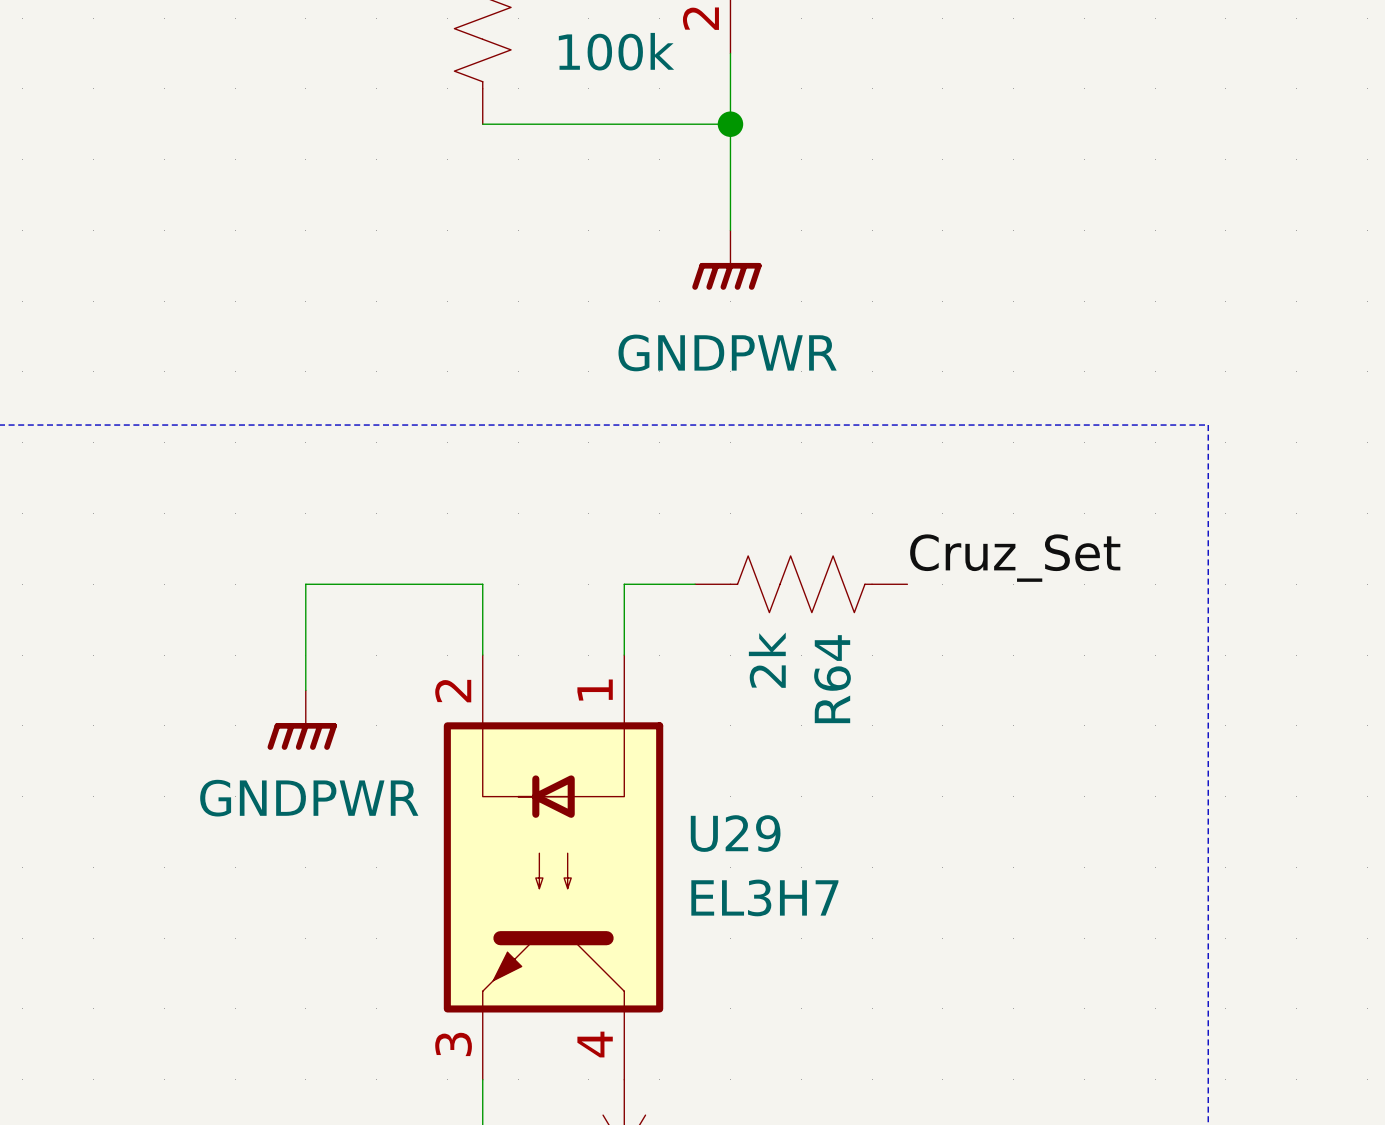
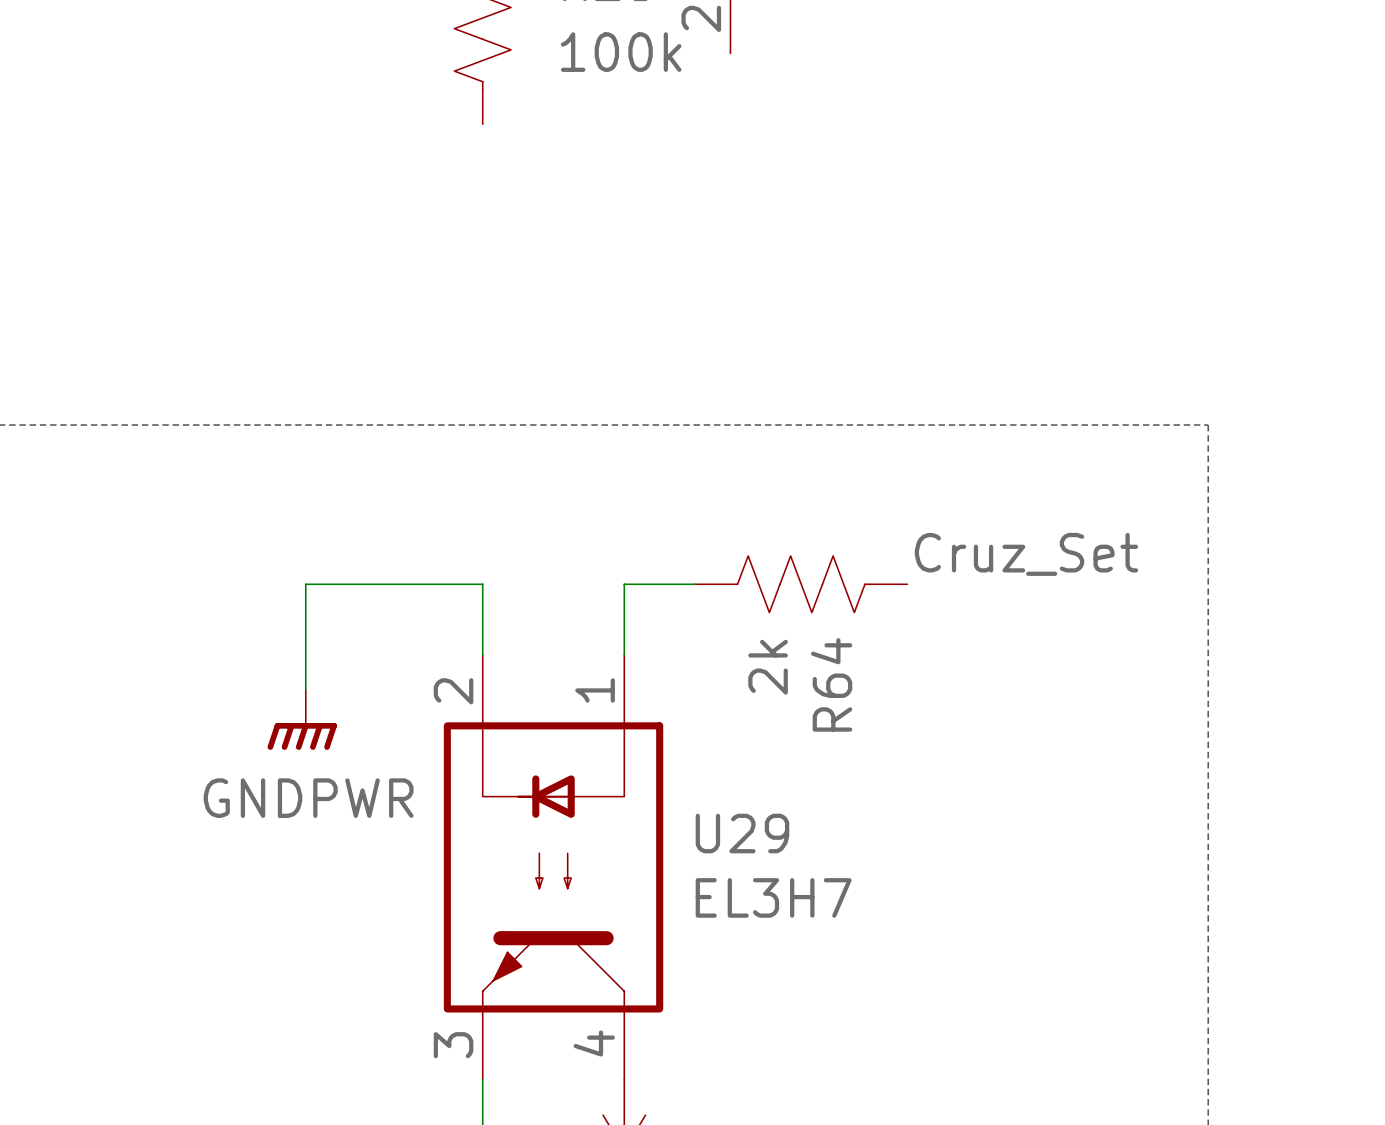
wire: (730, 53) (730, 230) -> none
wire: (482, 124) (730, 124) -> none
junction: (730, 124) -> none
power symbol: GNDPWR (726, 260) -> none

